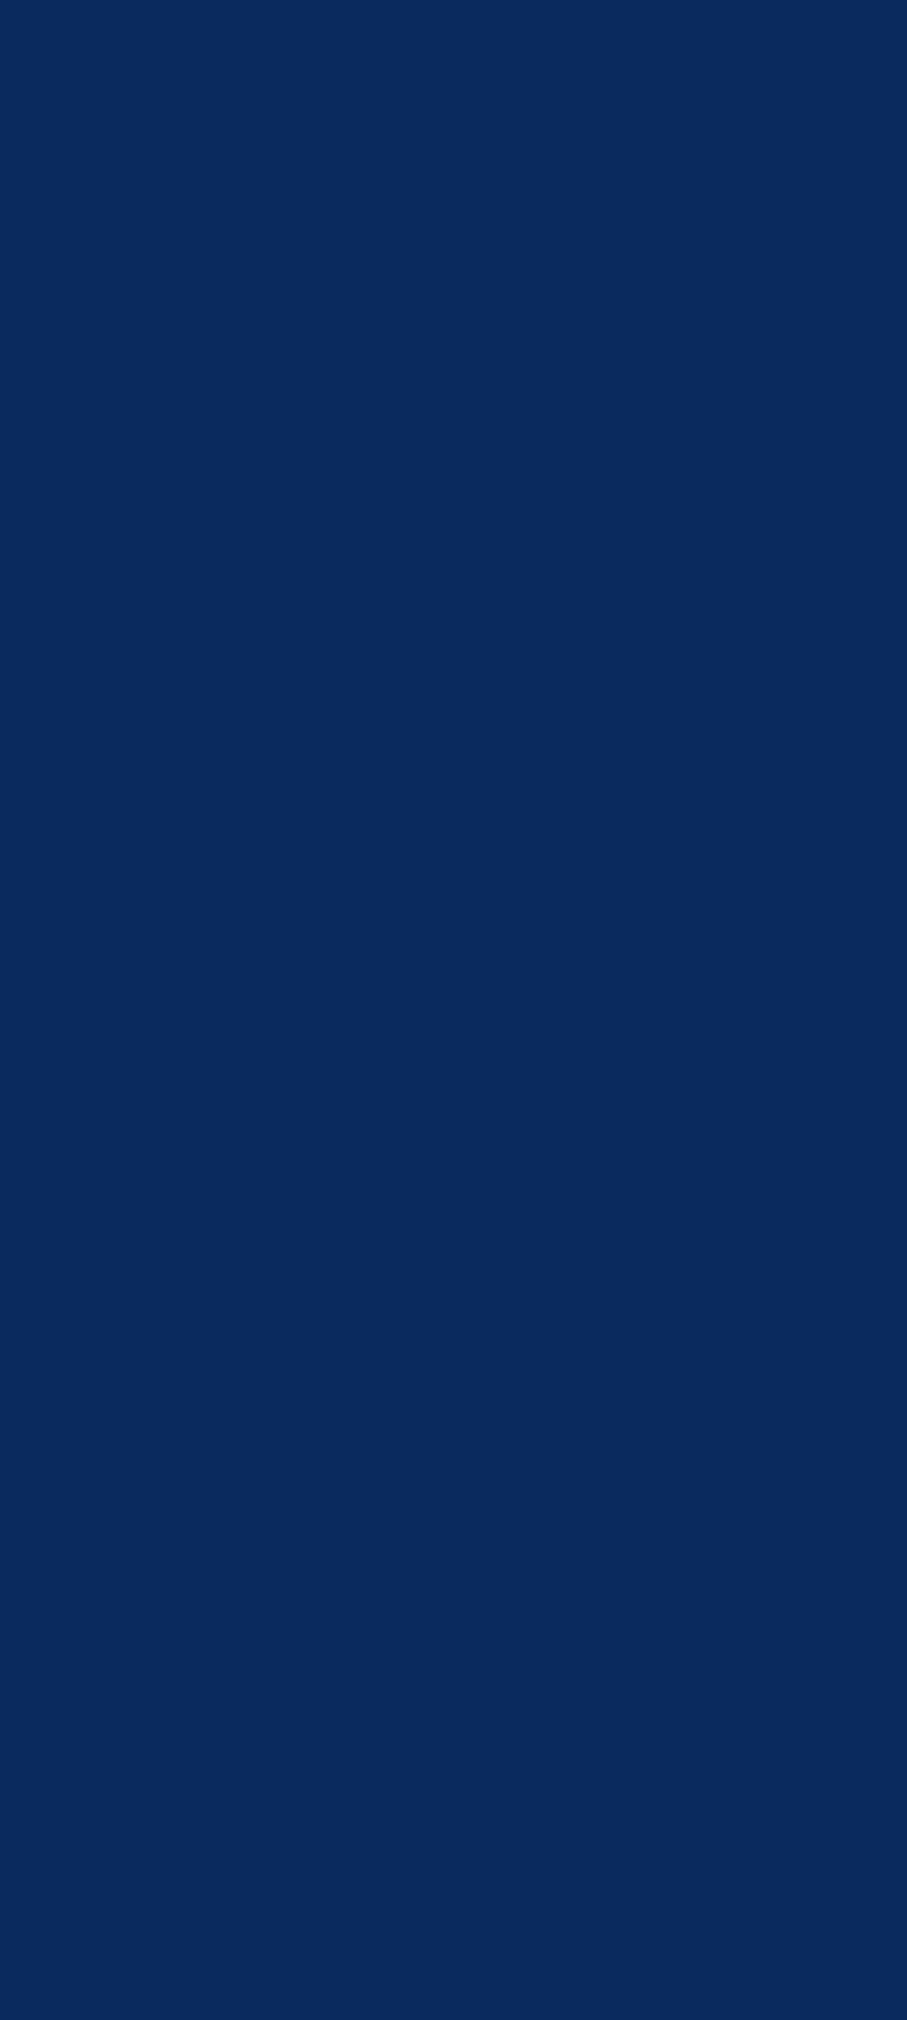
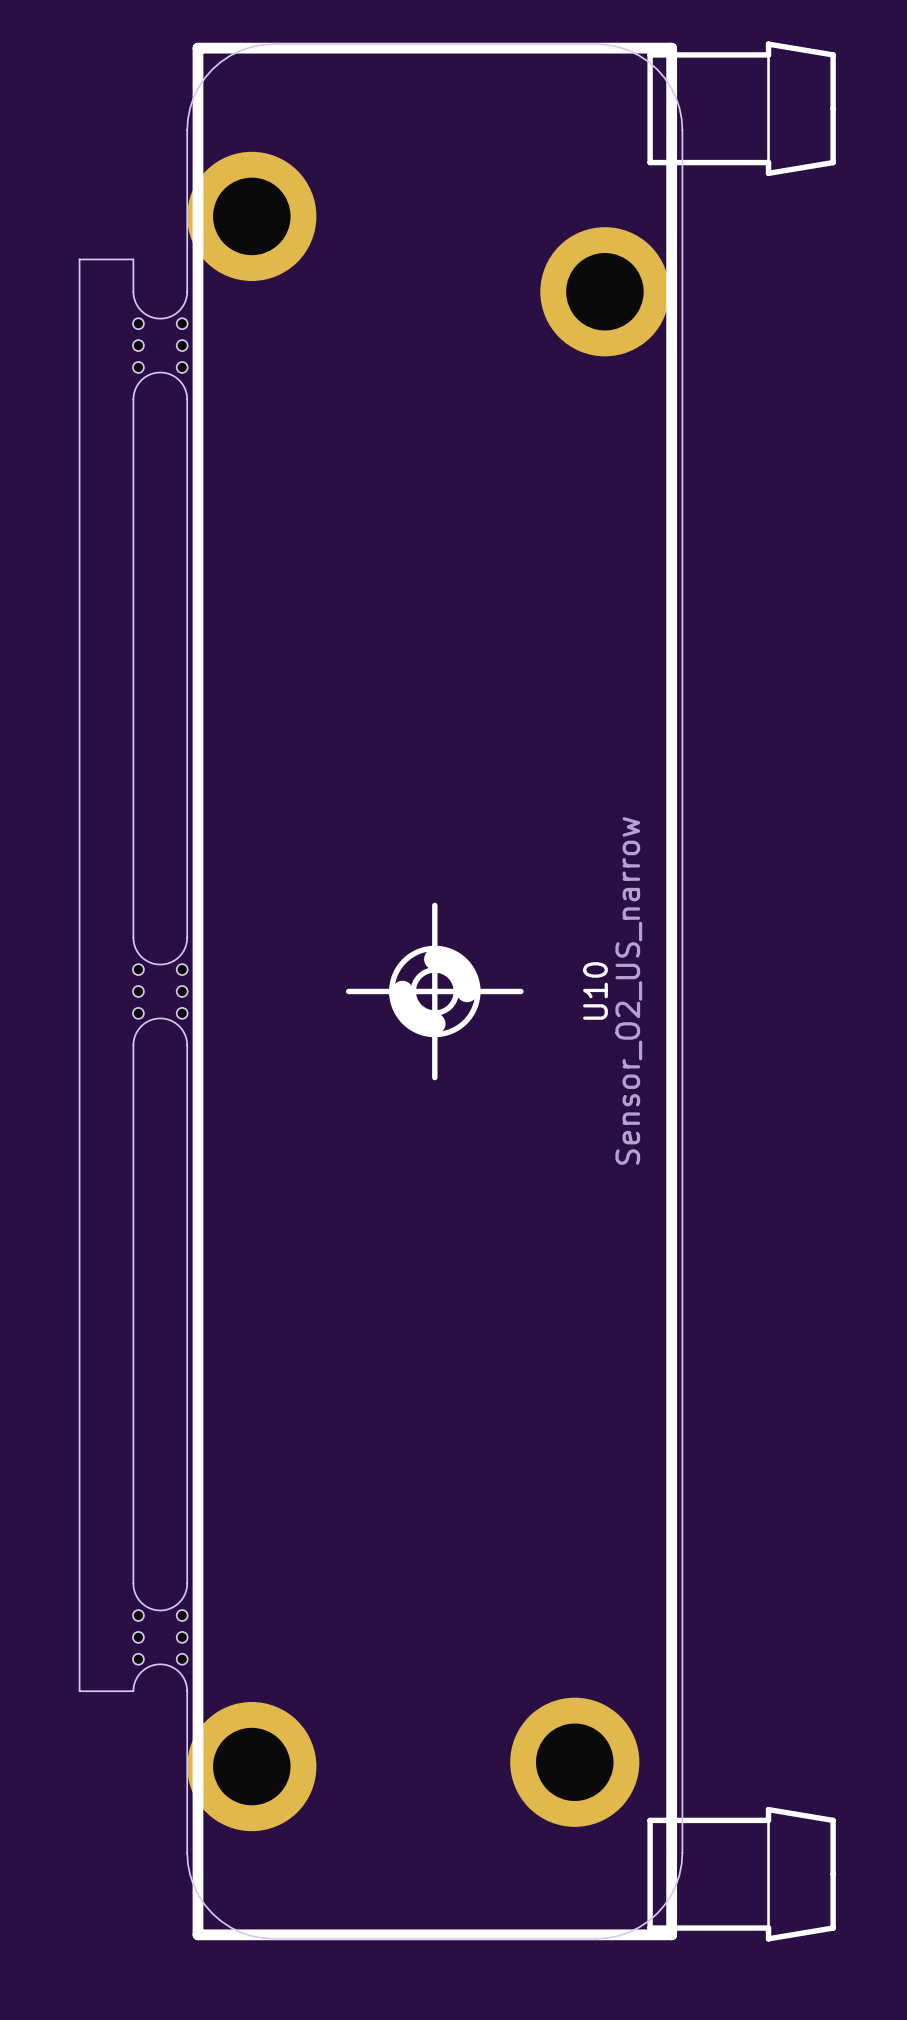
board edge: none -> (273, 44) (607, 44) (639, 55) (657, 69) (670, 87) (681, 119) (682, 1852) (675, 1885) (664, 1905) (639, 1927) (607, 1938) (273, 1938) (240, 1932) (220, 1921) (205, 1905) (190, 1874) (187, 1852) (187, 1691) (183, 1677) (173, 1667) (156, 1664) (141, 1672) (135, 1680) (133, 1691) (79, 1691) (79, 259) (133, 259) (133, 295) (141, 310) (150, 316) (160, 318) (170, 316) (179, 310) (186, 295) (187, 130) (193, 97) (205, 77) (220, 61) (240, 50) (273, 44)
part: none -> (160, 345)
board edge: none -> (133, 399) (133, 937) (135, 947) (141, 956) (150, 962) (160, 964) (170, 962) (179, 956) (185, 947) (187, 937) (187, 399) (185, 389) (179, 380) (170, 374) (160, 372) (150, 374) (141, 380) (135, 389) (133, 399)
part: none -> (160, 991)
U10: none -> Sensor_O2_US_narrow (511, 991)
board edge: none -> (133, 1045) (133, 1583) (135, 1593) (141, 1602) (150, 1608) (160, 1610) (170, 1608) (179, 1602) (185, 1593) (187, 1583) (187, 1045) (185, 1035) (179, 1026) (170, 1020) (160, 1018) (150, 1020) (141, 1026) (135, 1035) (133, 1045)
part: none -> (160, 1637)

